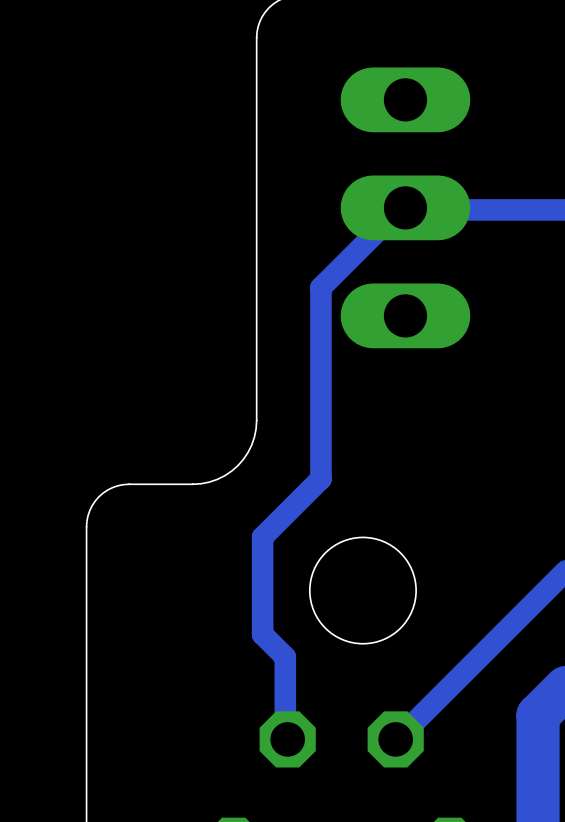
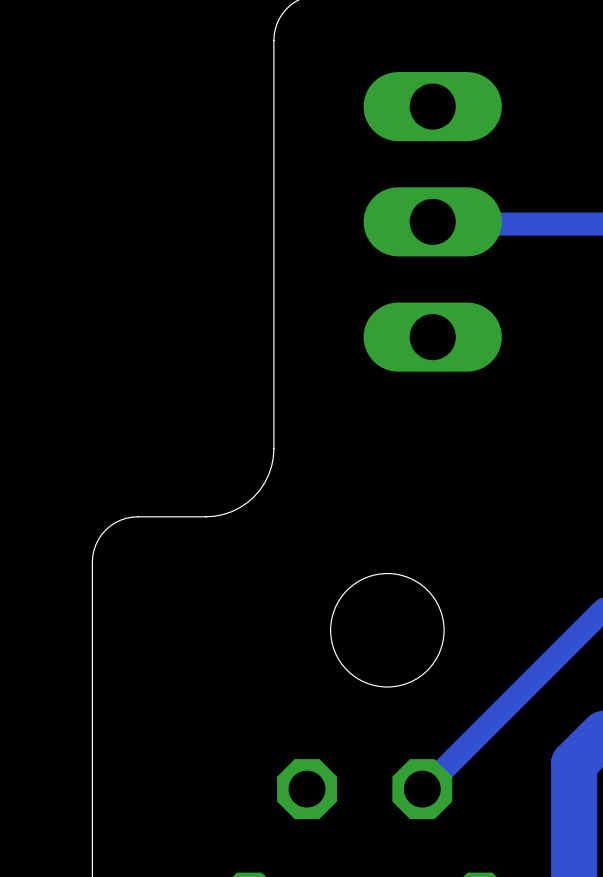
track: (405, 207) (395, 213) (320, 287) (320, 478) (262, 537) (262, 634) (285, 657) (285, 738) (287, 739) -> none

